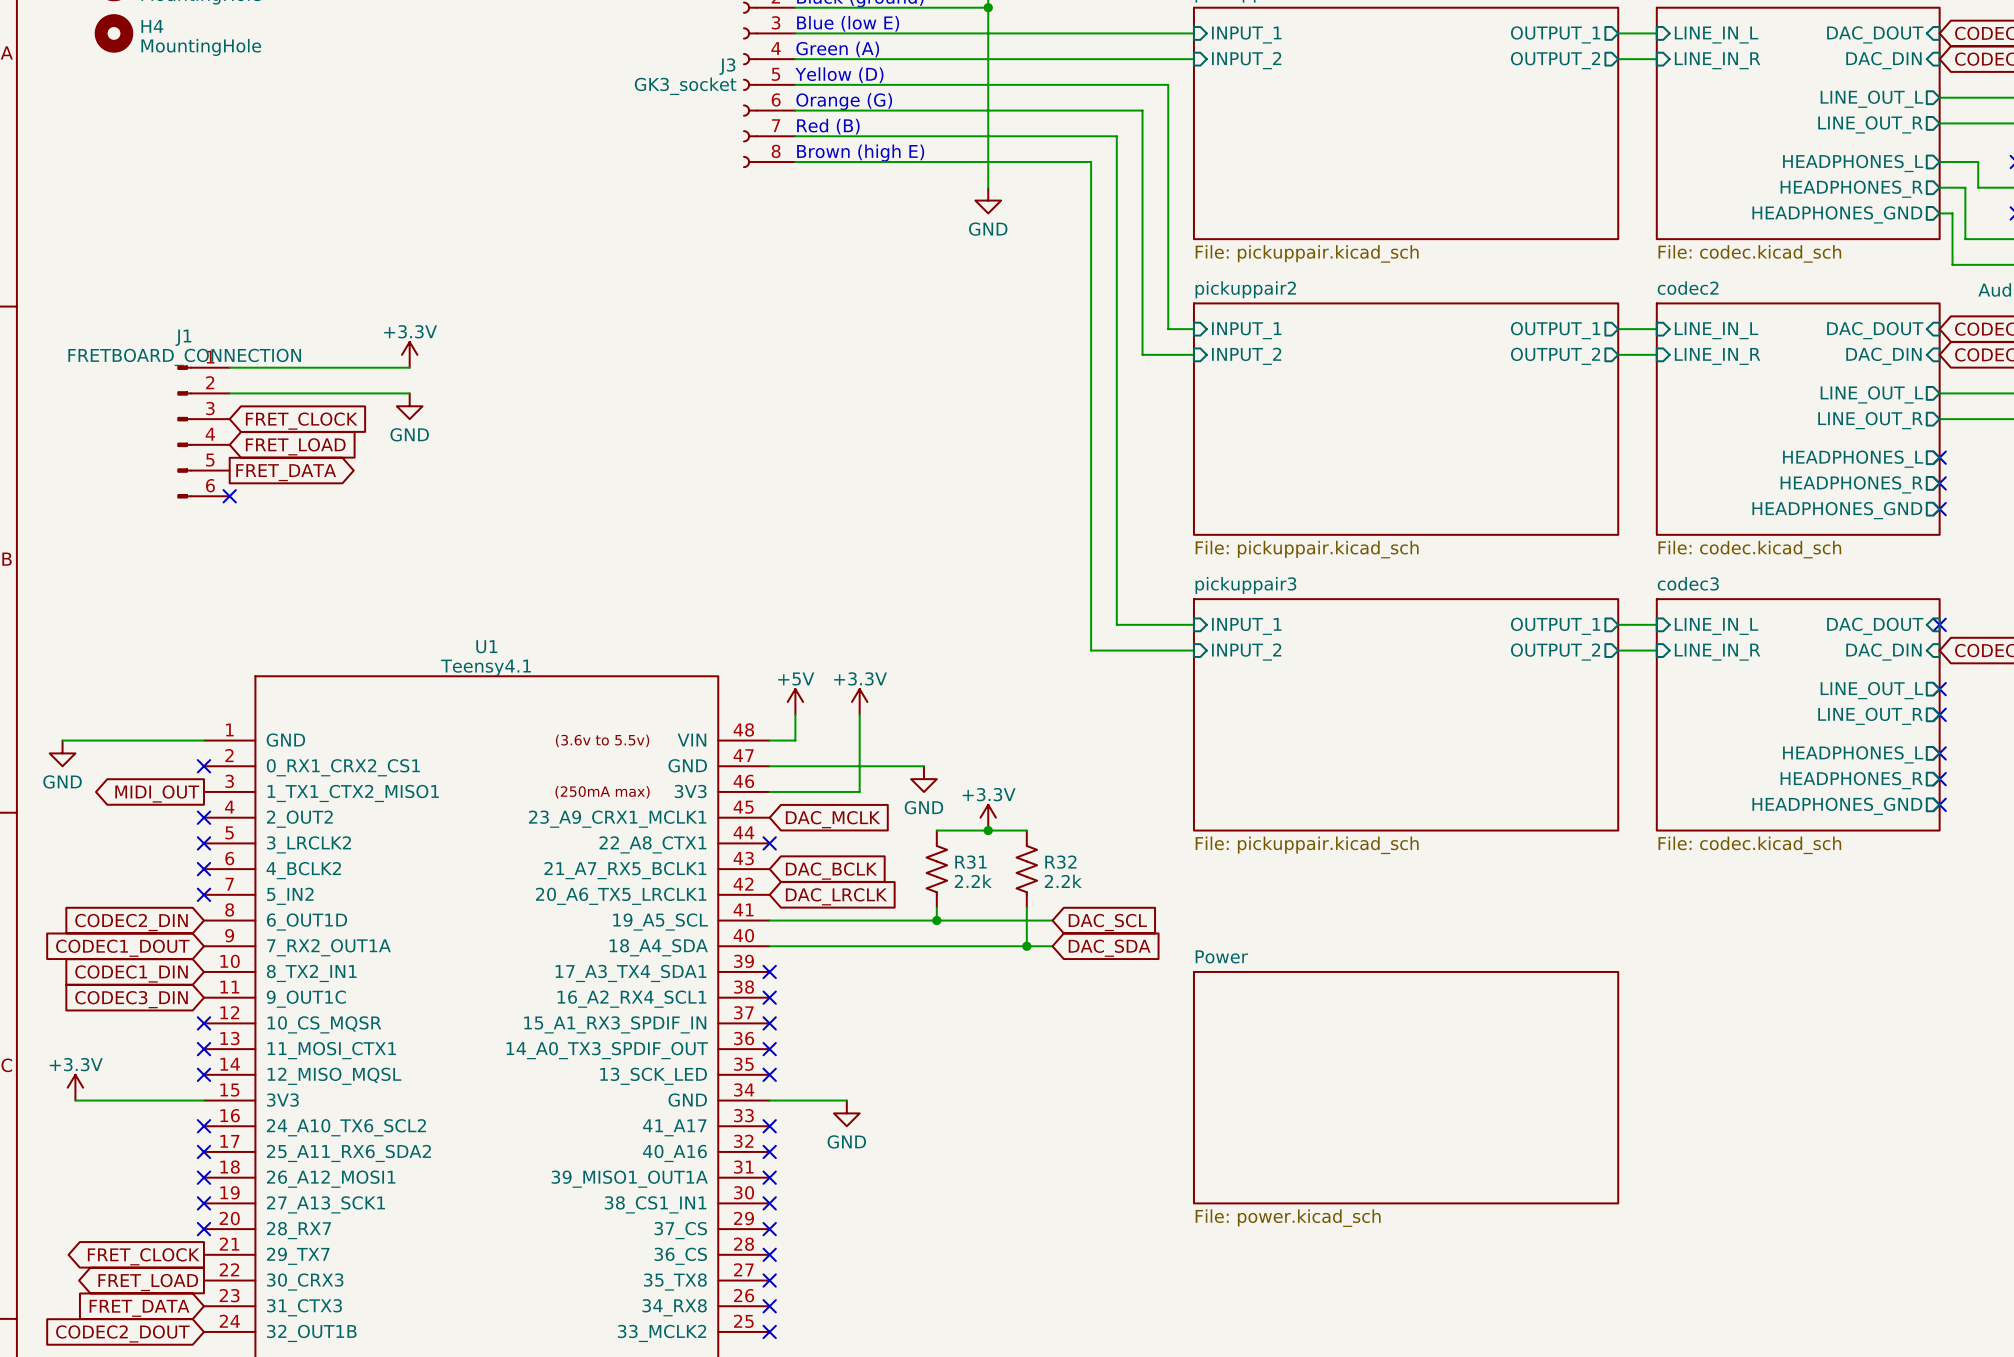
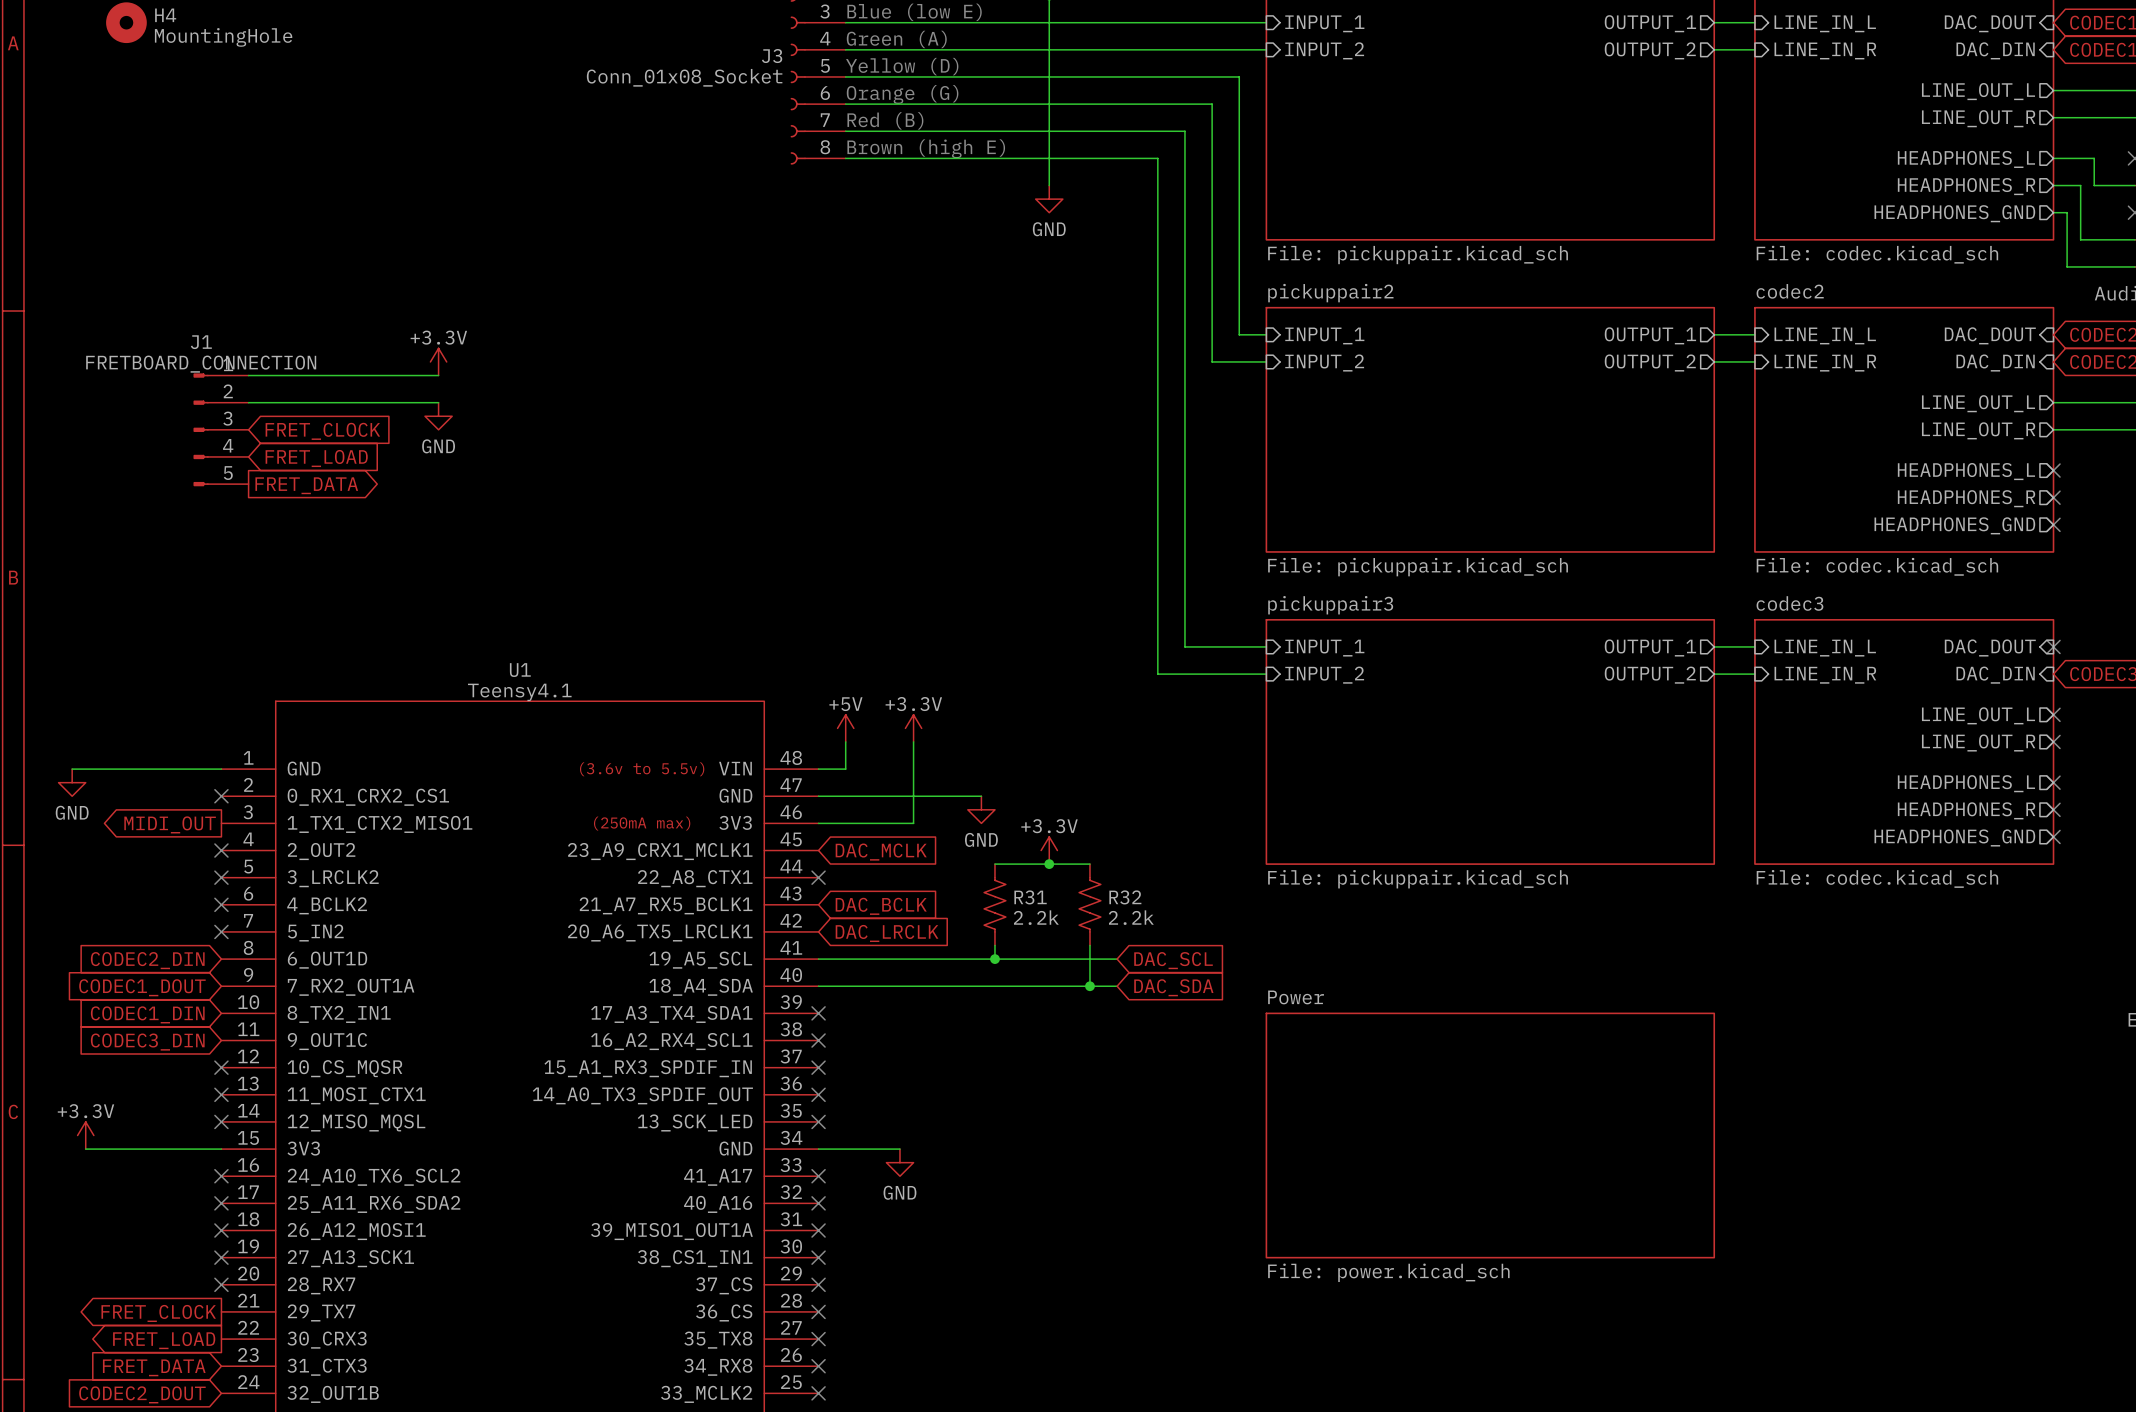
J3 value: GK3_socket (685, 86) -> Conn_01x08_Socket (684, 77)
J1 symbol: [177, 365, 230, 499] -> [193, 373, 249, 487]
no-connect mark: (229, 496) -> none

